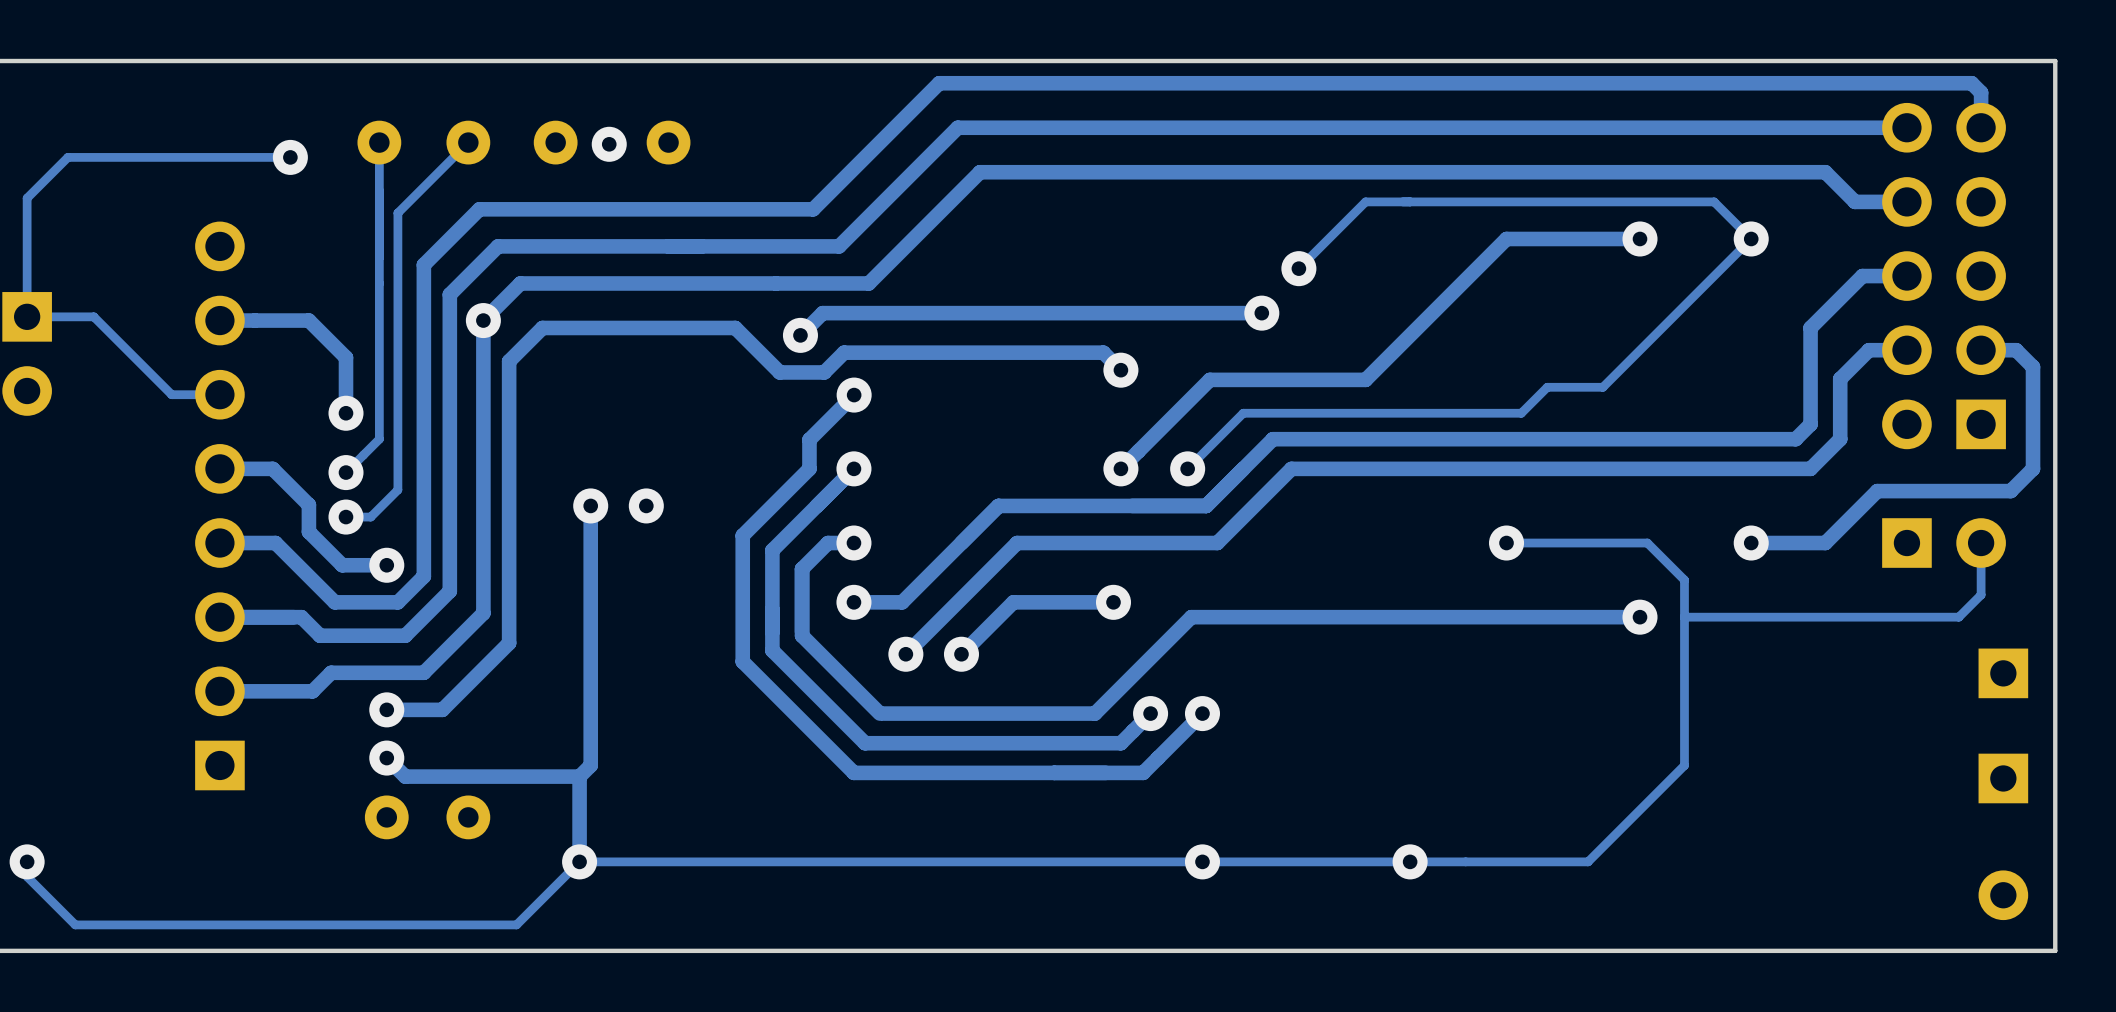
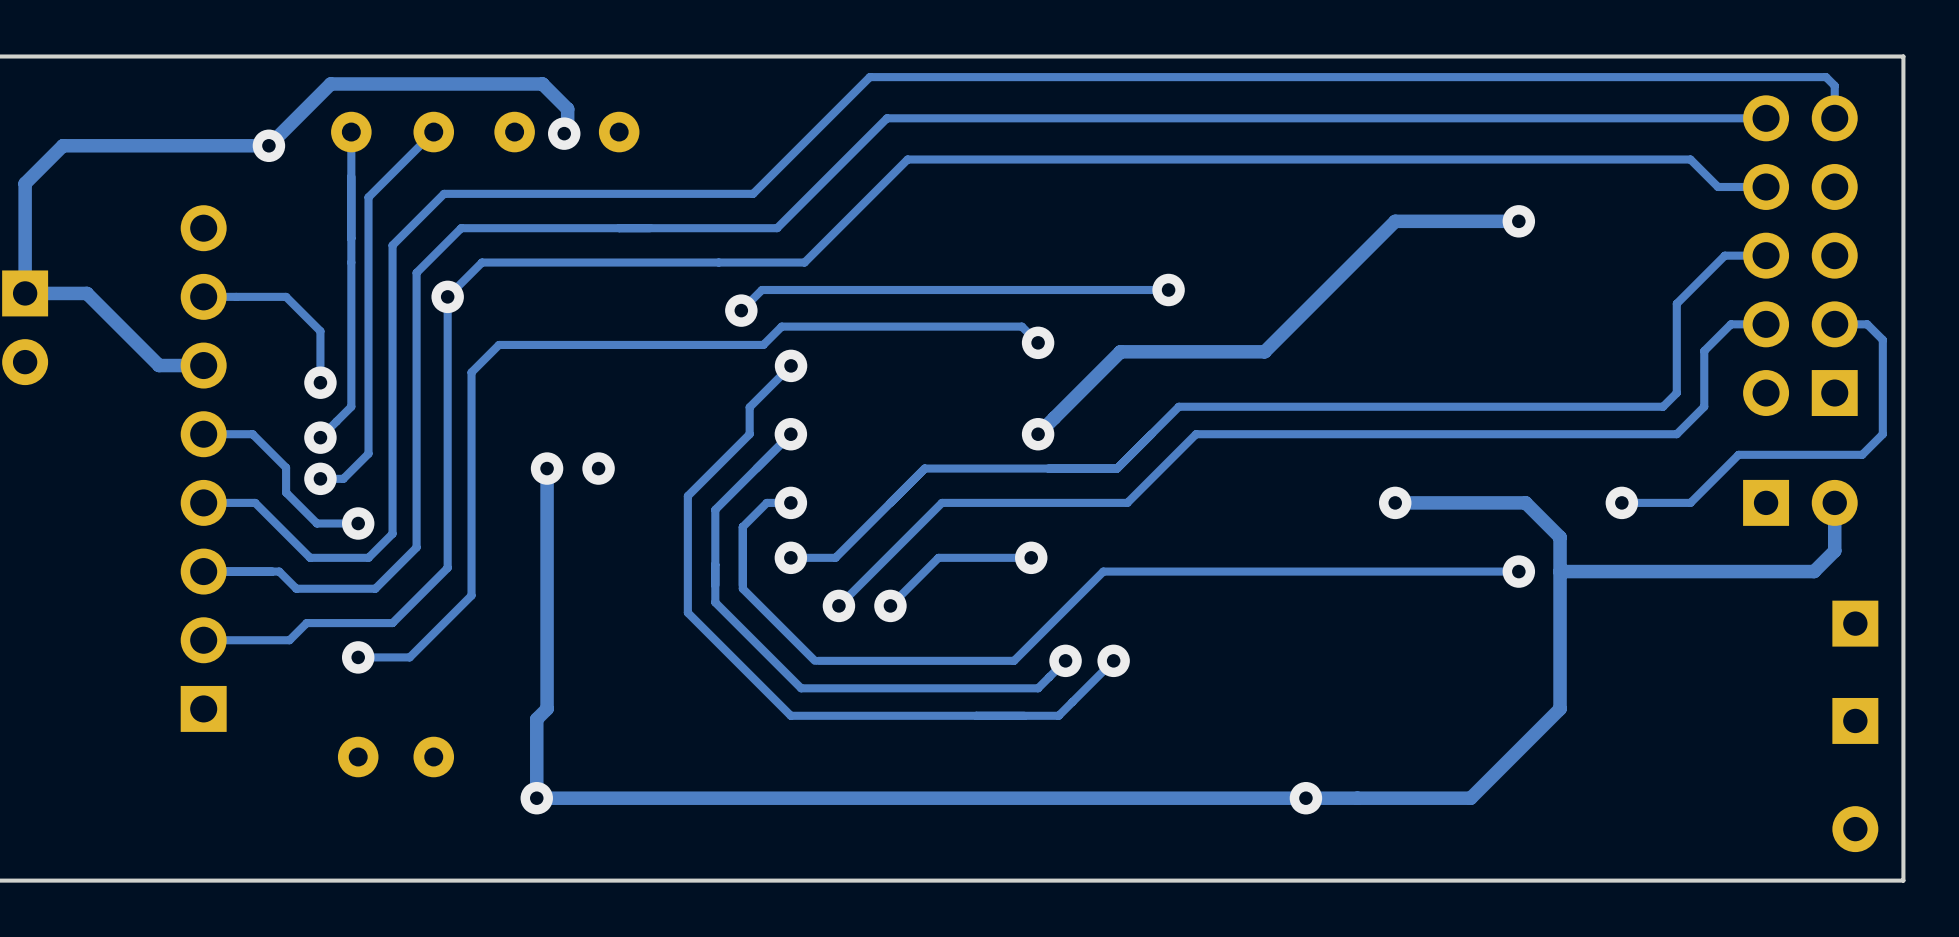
track width: thick (1906, 127) (957, 127) (839, 246) (498, 246) (449, 294) (449, 591) (405, 635) (320, 635) (301, 617) (219, 617) -> thin (1766, 118) (887, 118) (777, 228) (461, 228) (416, 272) (416, 547) (375, 588) (296, 588) (279, 571) (203, 571)
track width: thick (1981, 127) (1981, 92) (1971, 83) (939, 83) (813, 209) (479, 209) (423, 264) (423, 576) (397, 602) (334, 602) (275, 543) (219, 543) -> thin (1834, 118) (1834, 85) (1826, 77) (869, 77) (753, 193) (444, 193) (392, 245) (392, 533) (368, 557) (310, 557) (255, 502) (203, 502)
track: none -> (567, 132) (567, 109) (542, 83) (330, 83) (268, 145)
track width: thin (290, 157) (67, 157) (27, 198) (27, 316) (93, 316) (171, 394) (219, 394) -> thick (268, 145) (62, 145) (25, 183) (25, 293) (86, 293) (159, 365) (203, 365)
track width: thick (1906, 201) (1855, 201) (1825, 172) (980, 172) (868, 283) (520, 283) (483, 320) (483, 613) (423, 672) (331, 672) (312, 691) (219, 691) -> thin (1766, 186) (1717, 186) (1690, 159) (907, 159) (804, 262) (482, 262) (447, 296) (447, 567) (392, 623) (306, 623) (289, 640) (203, 640)
via: (1751, 238) -> none
track: (1298, 268) (1365, 201) (1714, 201) (1751, 238) (1602, 387) (1547, 387) (1521, 413) (1243, 413) (1187, 468) -> none
via: (1298, 268) -> none
track width: thick (1906, 276) (1862, 276) (1810, 327) (1810, 424) (1795, 439) (1272, 439) (1206, 505) (998, 505) (902, 602) (853, 602) -> thin (1766, 255) (1724, 255) (1676, 303) (1676, 393) (1663, 406) (1178, 406) (1117, 468) (924, 468) (835, 557) (790, 557)
track width: thick (1261, 313) (822, 313) (800, 335) -> thin (1168, 290) (761, 290) (741, 310)
track width: thick (219, 320) (308, 320) (346, 357) (346, 413) -> thin (203, 296) (286, 296) (320, 331) (320, 382)
track width: thick (1906, 350) (1869, 350) (1840, 379) (1840, 439) (1810, 468) (1291, 468) (1217, 543) (1017, 543) (905, 654) -> thin (1766, 324) (1730, 324) (1704, 351) (1704, 406) (1676, 434) (1196, 434) (1127, 502) (941, 502) (838, 605)
track width: thick (1981, 350) (2016, 350) (2033, 367) (2033, 468) (2010, 491) (1877, 491) (1825, 543) (1751, 543) -> thin (1834, 324) (1867, 324) (1882, 339) (1882, 434) (1862, 454) (1738, 454) (1690, 502) (1621, 502)
track width: thick (1120, 370) (1103, 352) (844, 352) (824, 372) (779, 372) -> thin (1038, 342) (1021, 326) (781, 326) (763, 344) (722, 344)
track: (779, 372) (735, 327) (542, 327) (509, 361) (509, 402) -> (722, 344) (498, 344) (471, 372)
track width: thick (854, 395) (809, 439) (809, 468) (742, 535) (742, 661) (853, 772) (1143, 772) (1202, 713) -> thin (791, 365) (749, 407) (749, 434) (687, 496) (687, 612) (790, 715) (1058, 715) (1113, 660)
track width: thick (509, 402) (509, 643) (442, 709) (386, 709) -> thin (471, 372) (471, 595) (409, 657) (358, 657)
track width: thick (219, 468) (272, 468) (308, 505) (308, 531) (342, 565) (386, 565) -> thin (203, 434) (252, 434) (286, 467) (286, 492) (317, 523) (358, 523)
track width: thick (853, 468) (772, 550) (772, 650) (865, 743) (1120, 743) (1150, 713) -> thin (790, 434) (715, 509) (715, 602) (801, 688) (1038, 688) (1065, 660)
via: (1187, 468) -> none
track width: thick (853, 543) (828, 543) (802, 568) (802, 635) (879, 713) -> thin (790, 502) (766, 502) (742, 526) (742, 588) (814, 660)
track width: thin (1506, 543) (1647, 543) (1684, 580) (1684, 765) (1588, 861) (579, 861) -> thick (1395, 502) (1525, 502) (1560, 537) (1560, 708) (1470, 798) (536, 798)
track width: thin (1981, 543) (1981, 594) (1958, 617) (1684, 617) -> thick (1834, 502) (1834, 550) (1814, 571) (1560, 571)
track width: thick (1113, 602) (1013, 602) (961, 654) -> thin (1031, 557) (938, 557) (890, 605)
track width: thick (1640, 617) (1191, 617) (1094, 713) (883, 713) -> thin (1518, 571) (1103, 571) (1014, 660) (818, 660)
track: (386, 758) (405, 776) (579, 776) -> none
via: (386, 758) -> none
via: (27, 861) -> none
track: (579, 861) (516, 924) (75, 924) (27, 876) (27, 861) -> none
via: (1202, 861) -> none

